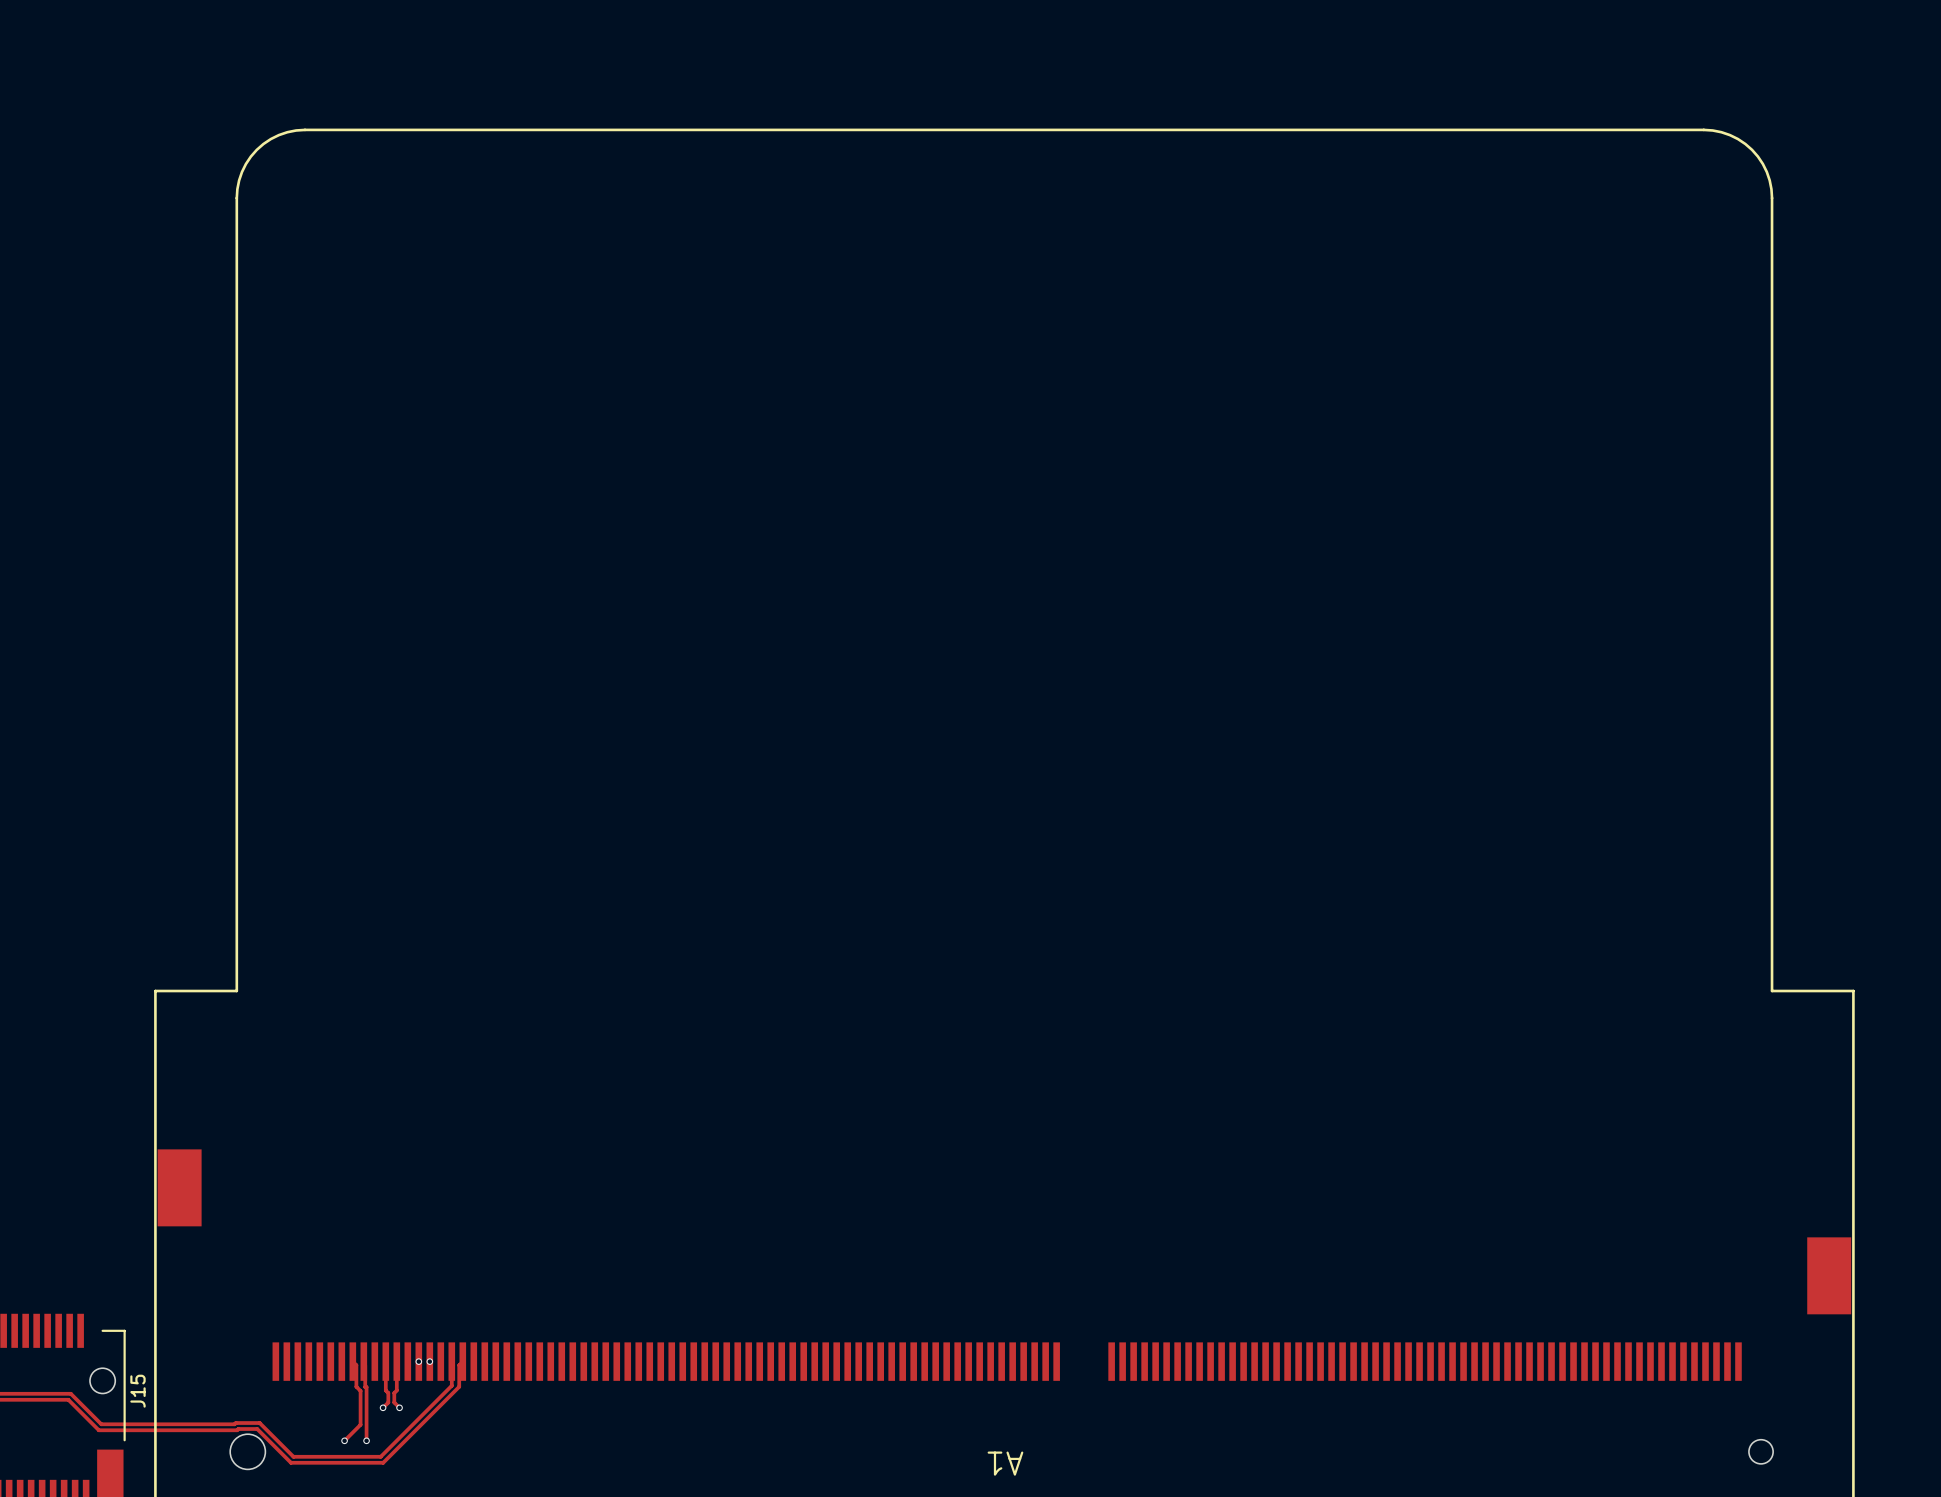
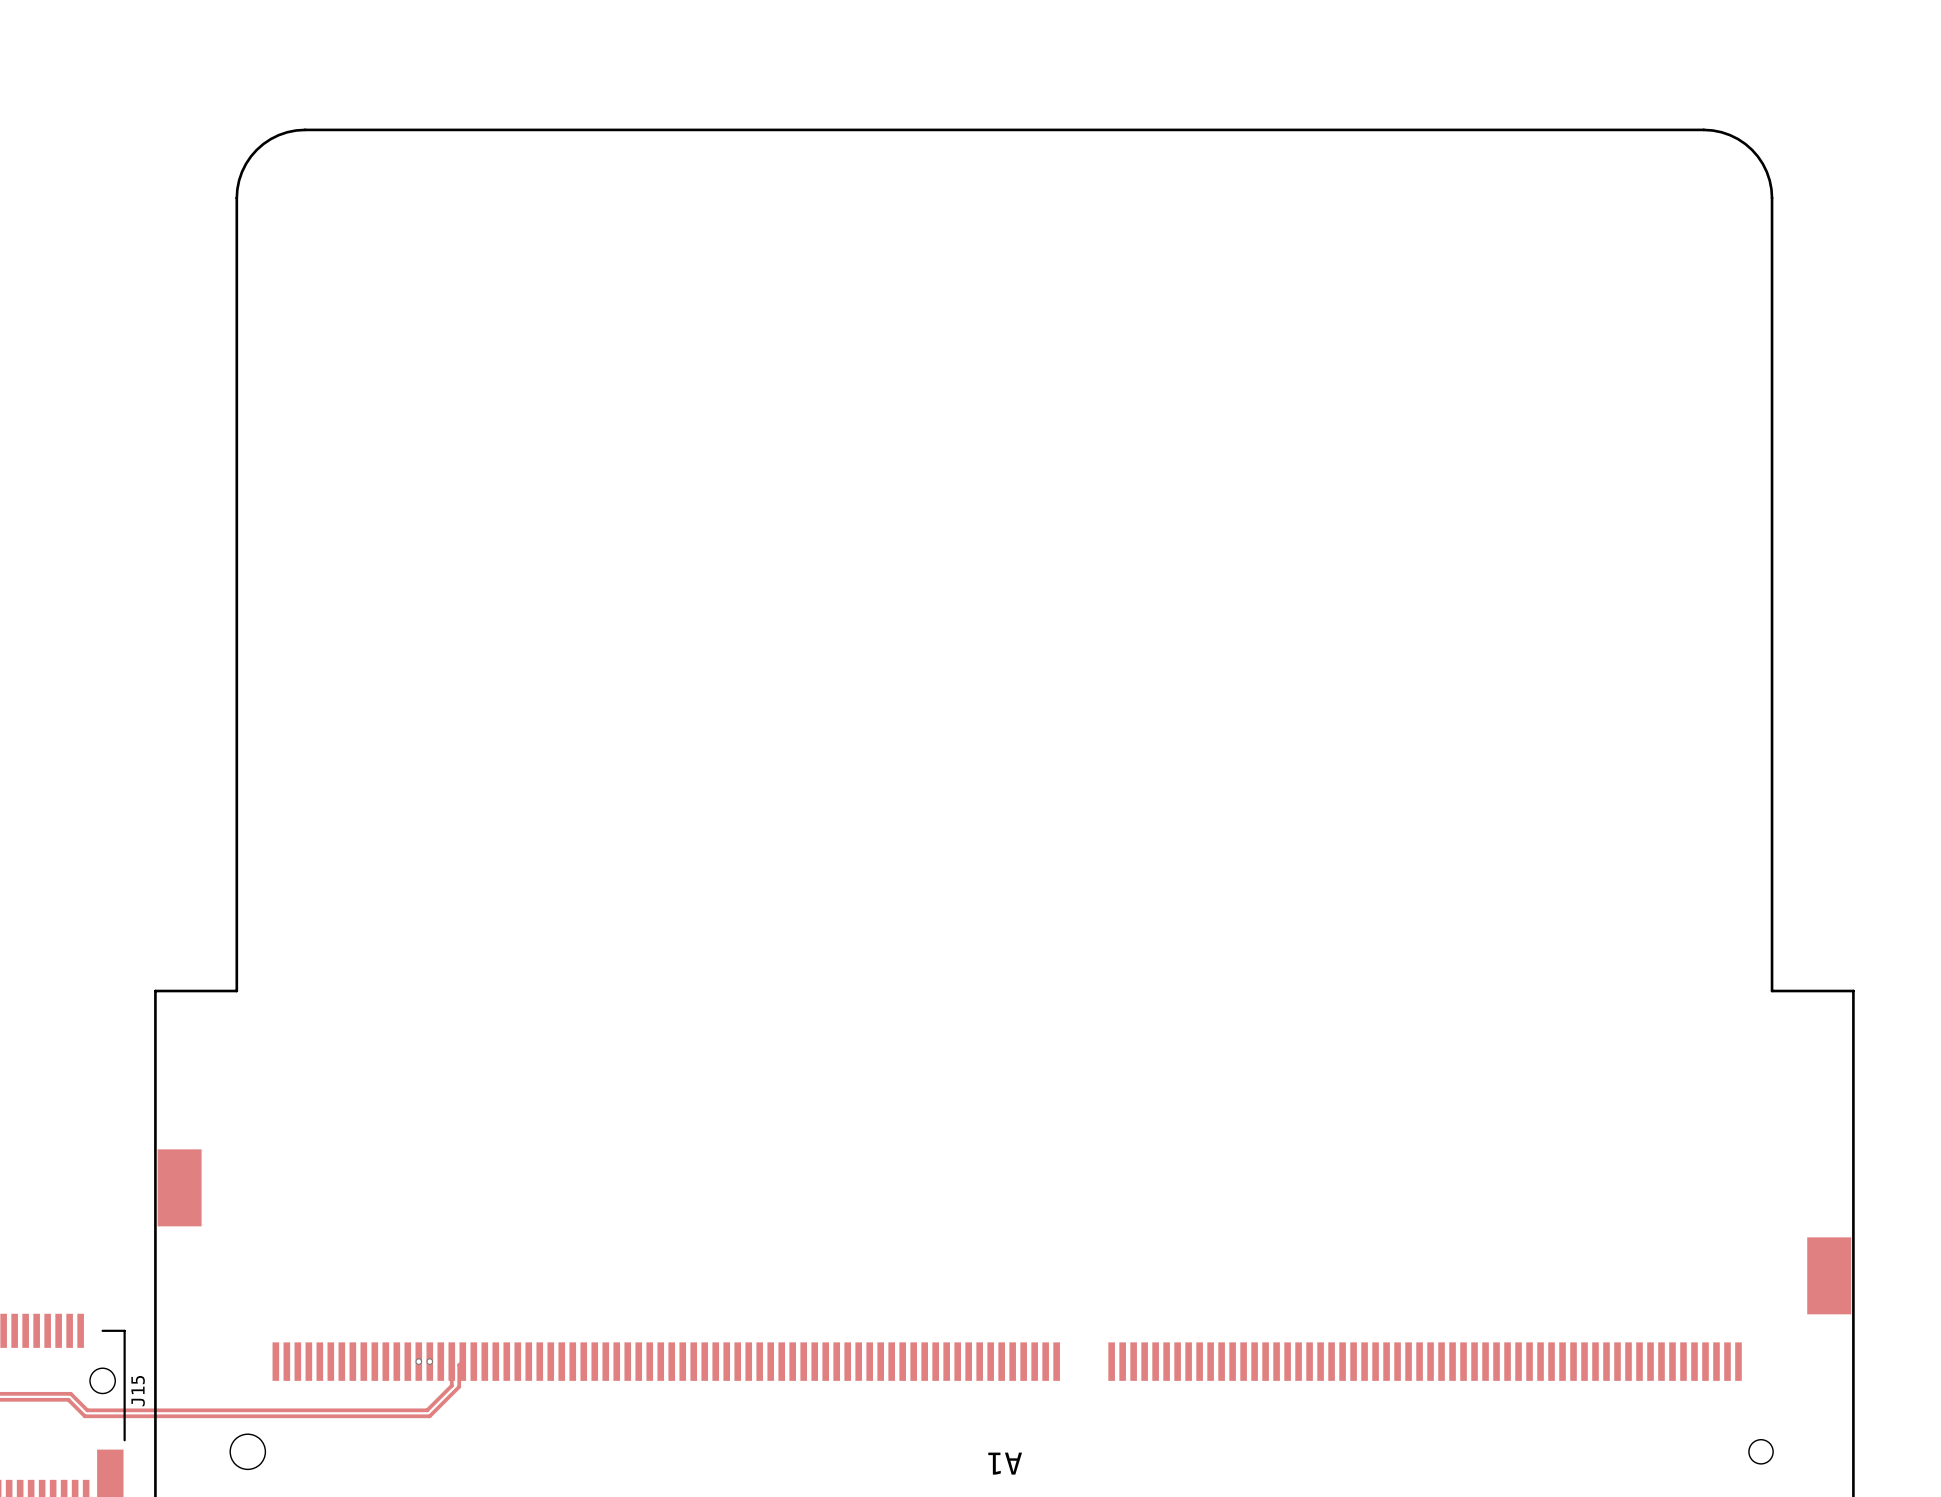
track: (352, 1361) (356, 1365) (356, 1386) (360, 1390) (360, 1424) (344, 1440) -> none
track: (363, 1361) (366, 1387) (366, 1440) -> none
track: (385, 1361) (385, 1390) (388, 1393) (388, 1402) (383, 1407) -> none
track: (396, 1361) (396, 1390) (394, 1393) (394, 1402) (399, 1407) -> none
via: (383, 1407) -> none
via: (399, 1407) -> none
track: (87, 1410) (101, 1424) (259, 1423) (293, 1456) (380, 1456) (427, 1410) -> (87, 1410) (427, 1410)
track: (84, 1416) (98, 1430) (257, 1429) (291, 1462) (383, 1462) (429, 1416) -> (84, 1416) (429, 1416)
via: (344, 1440) -> none
via: (366, 1440) -> none

